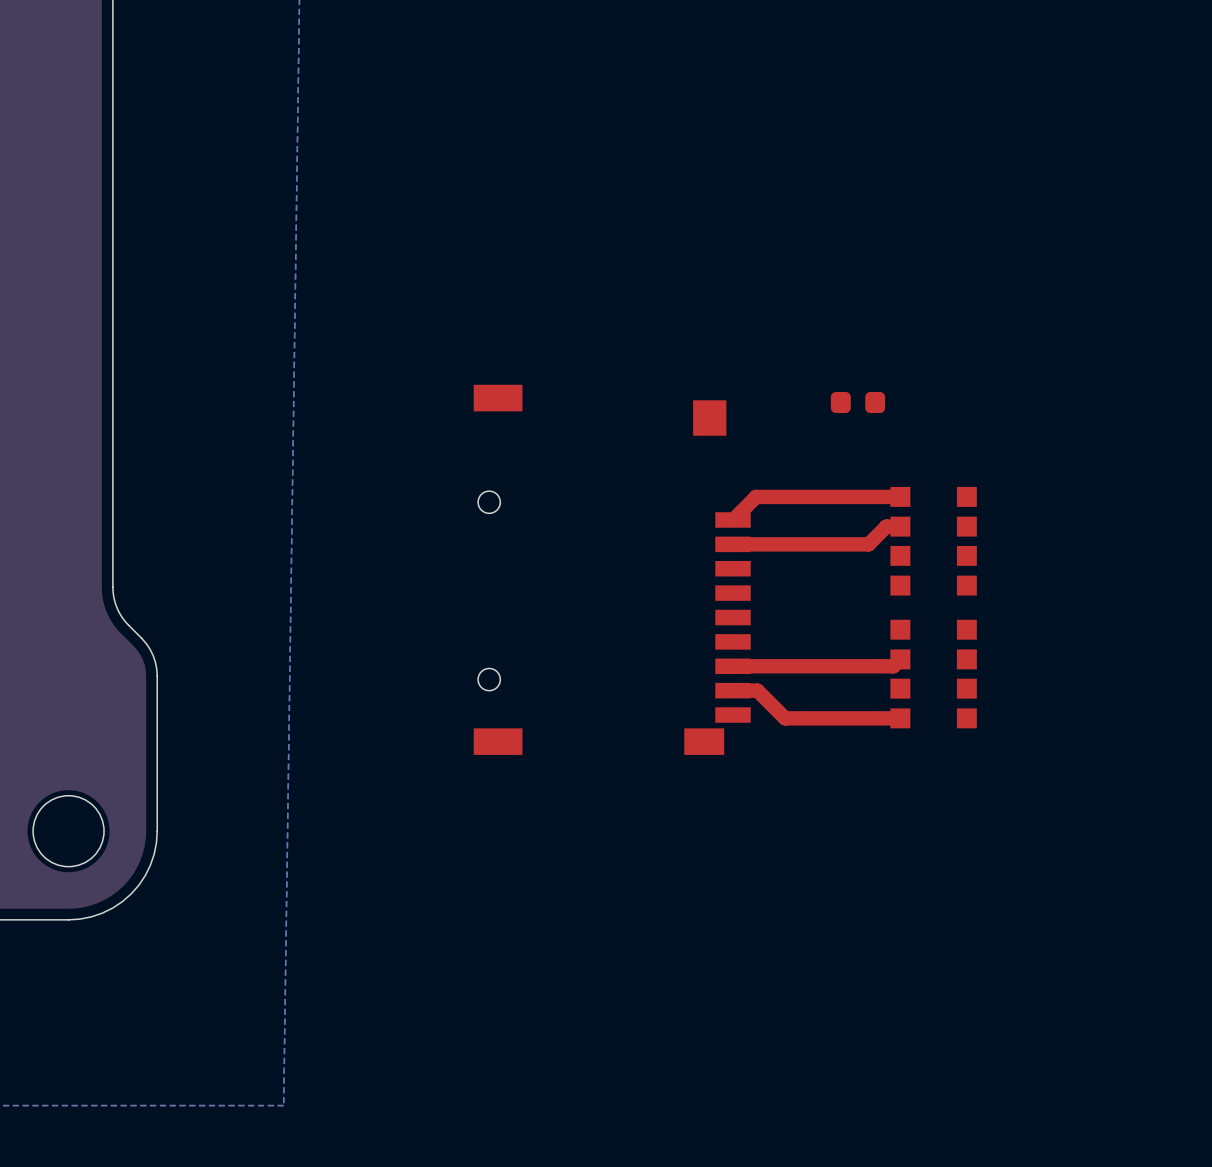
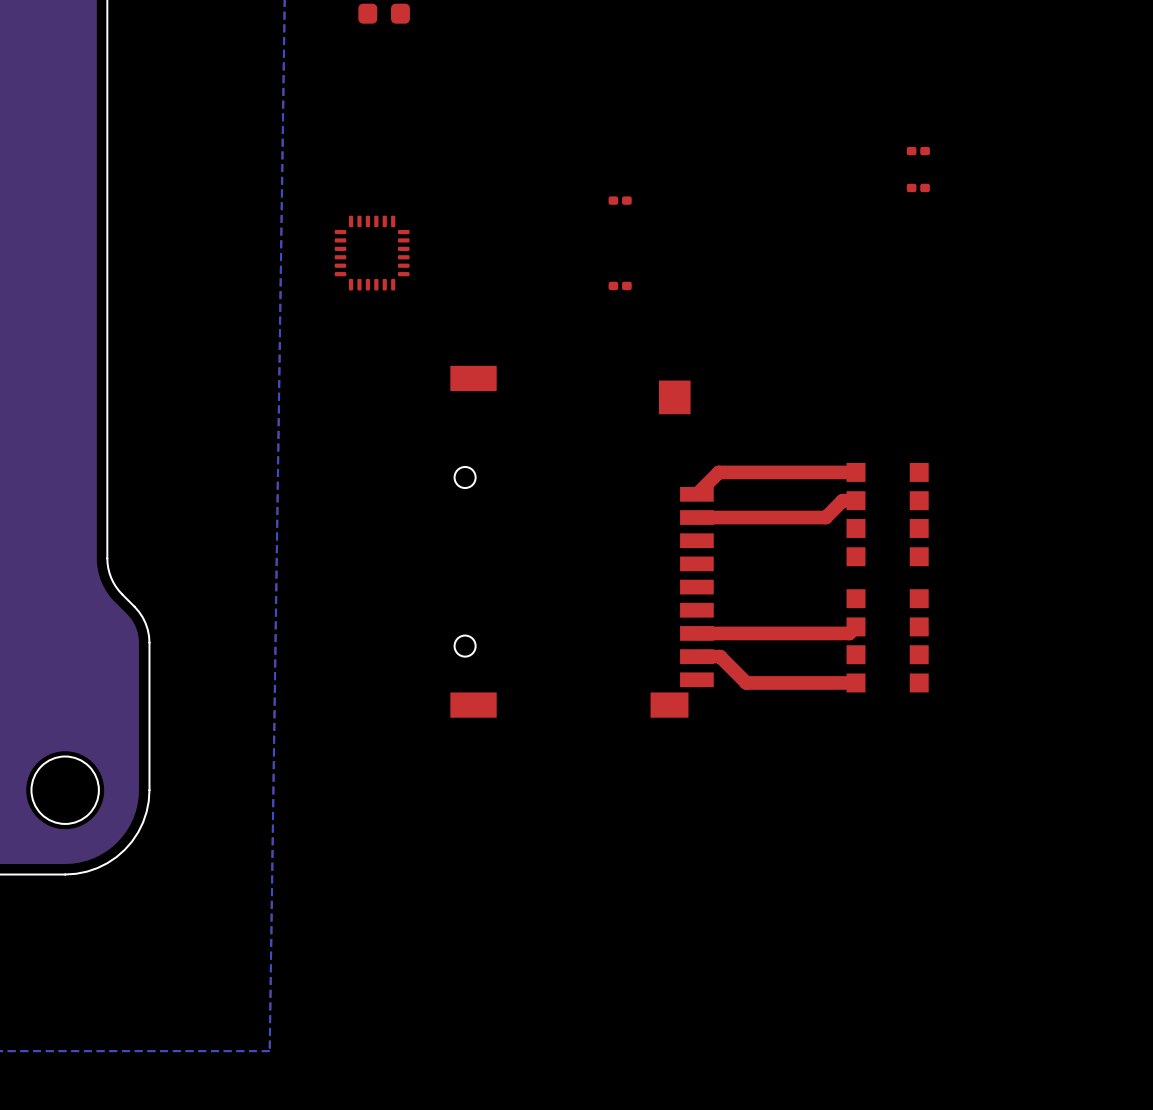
part: none -> (384, 13)
part: none -> (918, 151)
part: none -> (918, 187)
part: none -> (620, 200)
part: none -> (372, 253)
part: none -> (620, 285)
part: (857, 402) -> none

